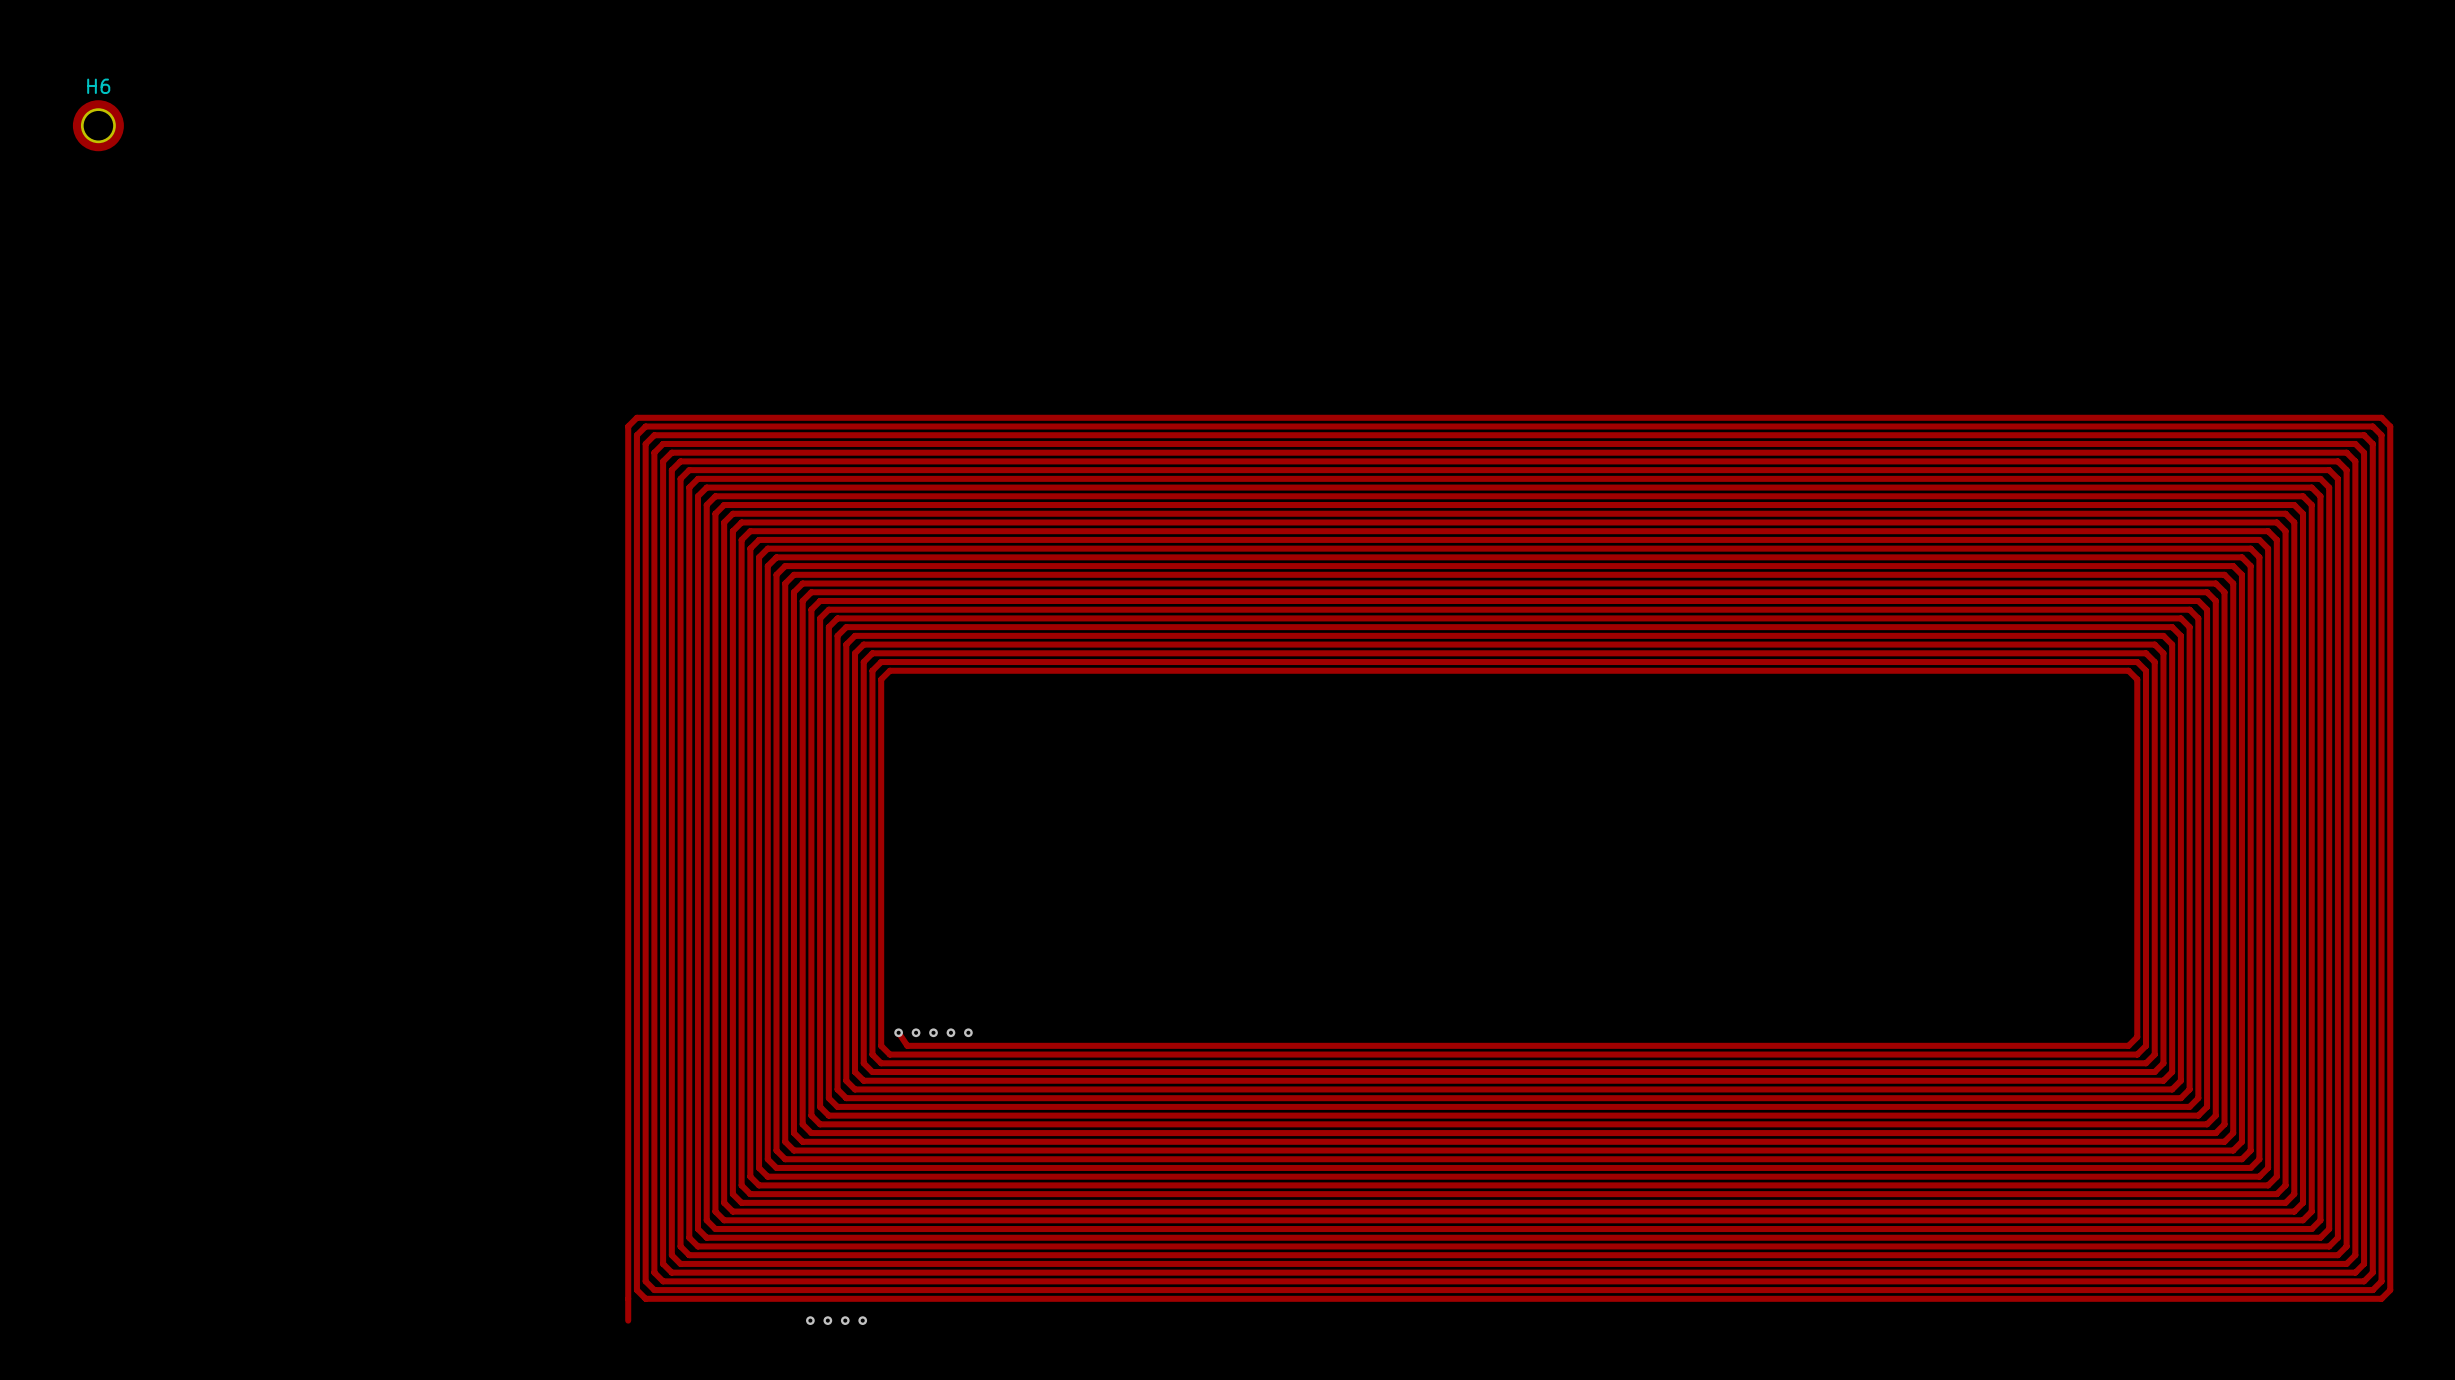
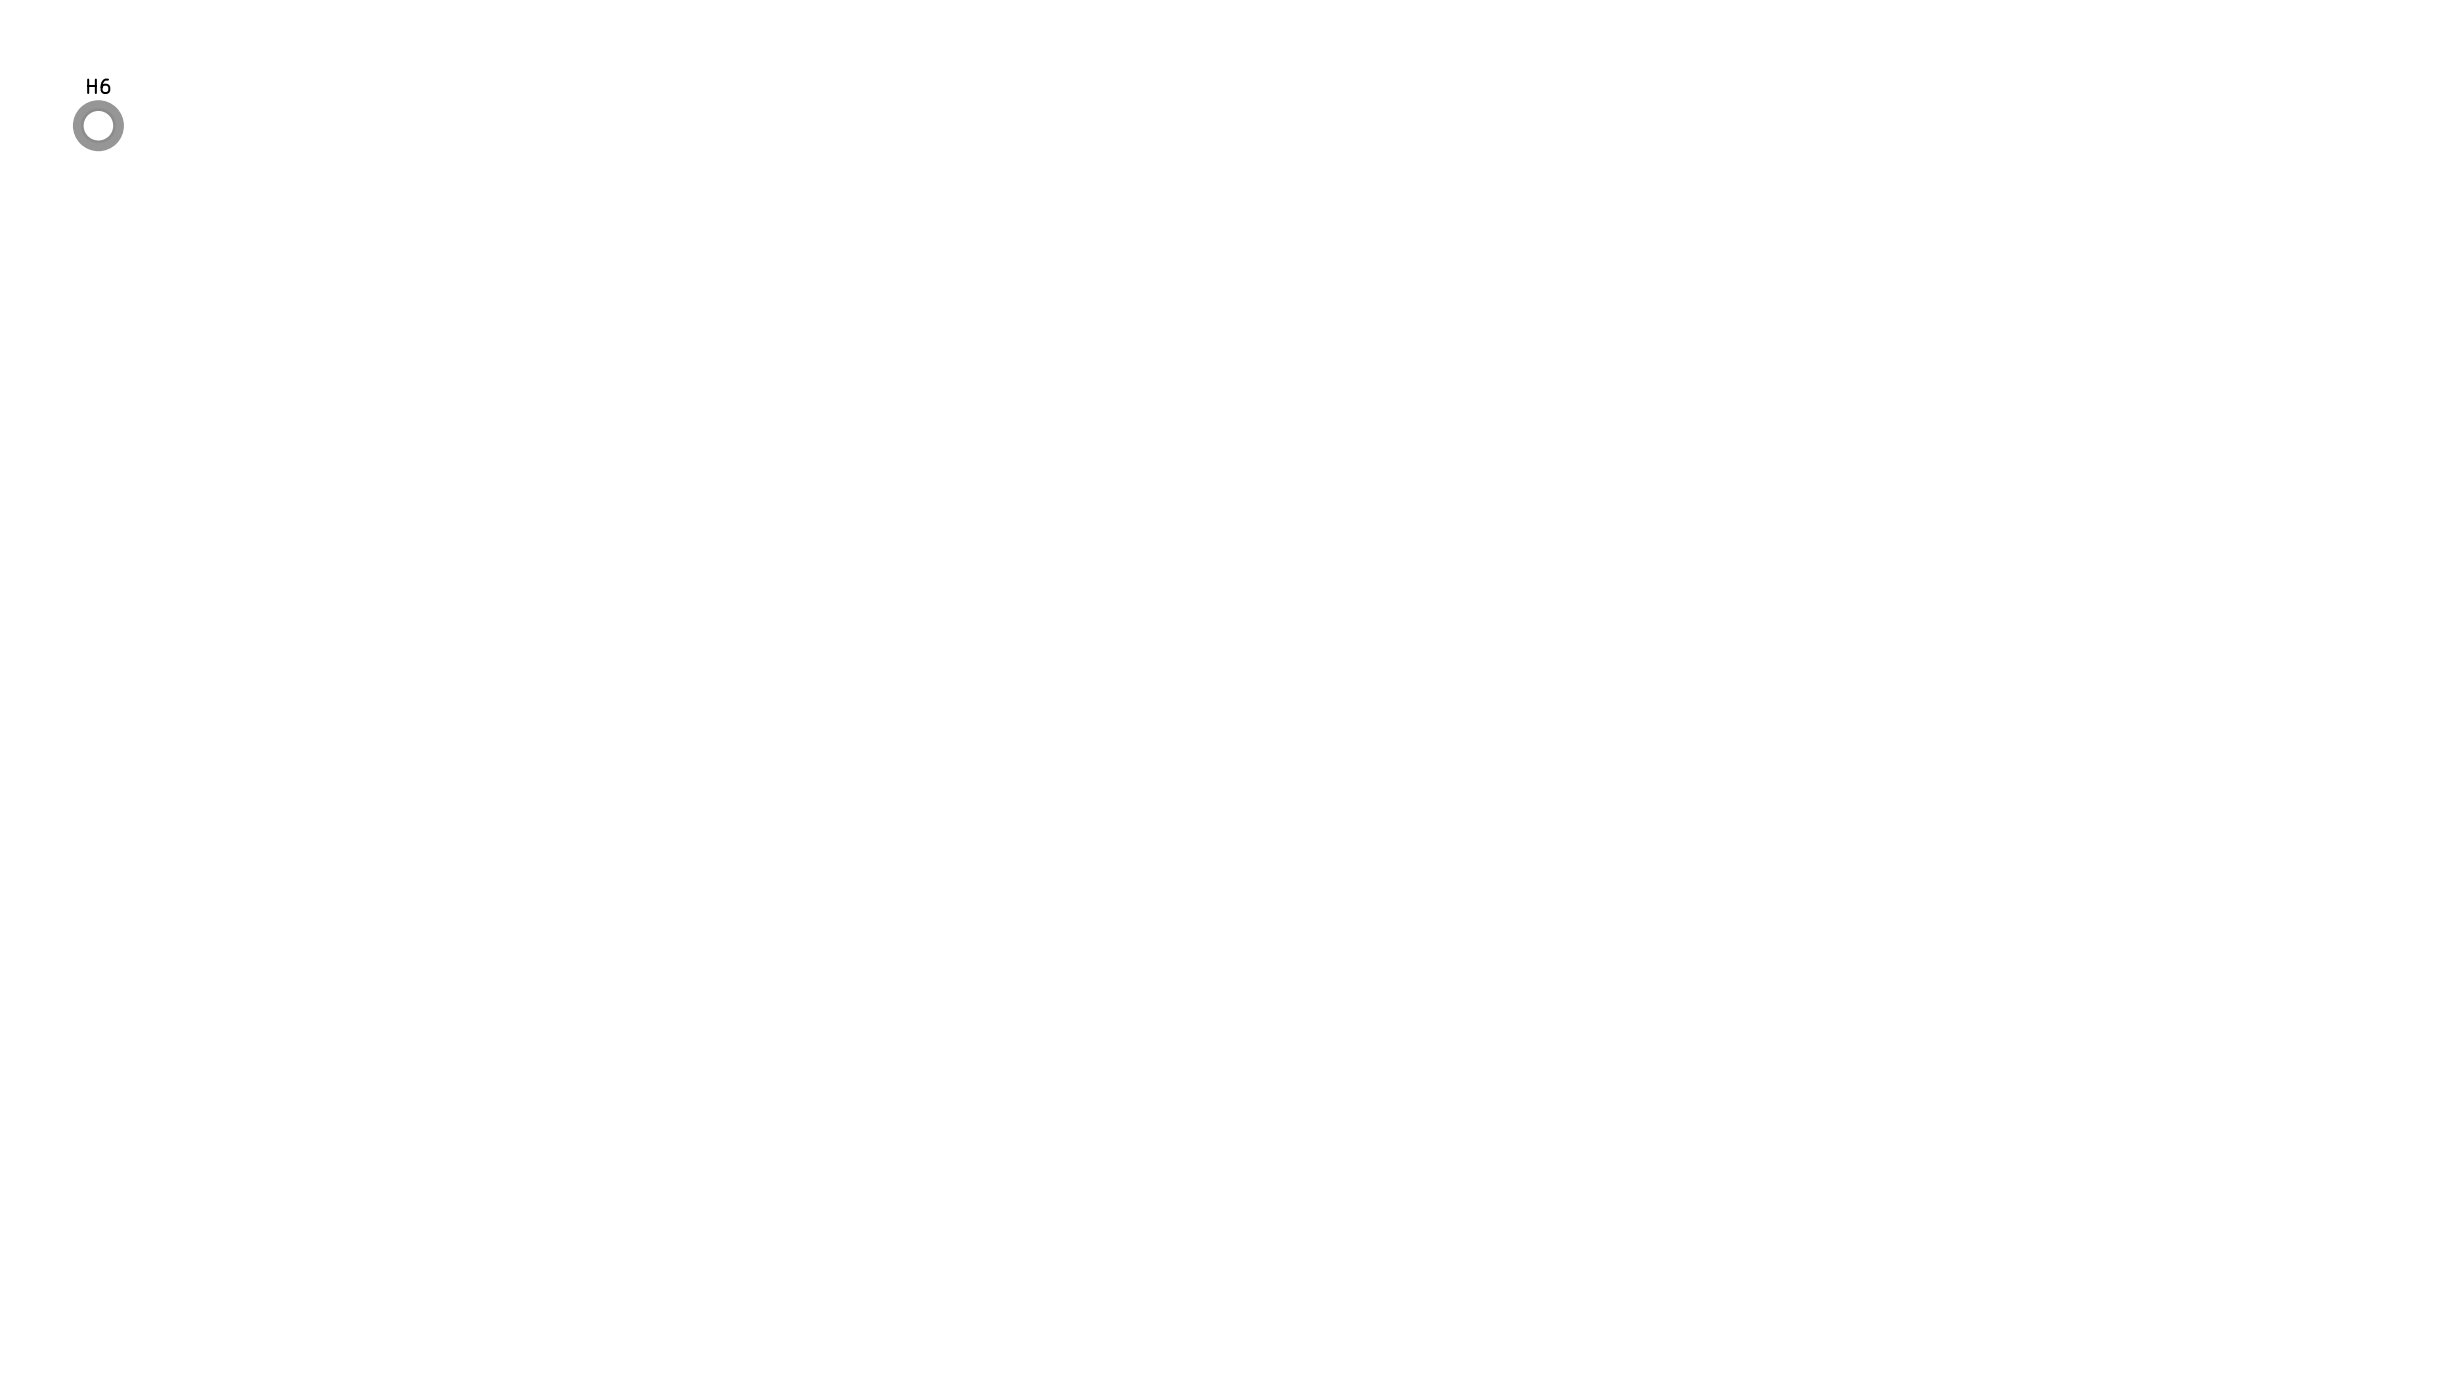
track: (898, 1032) (907, 1045) (2128, 1045) (2137, 1037) (2137, 679) (2128, 670) (889, 670) (881, 679) (881, 1045) (889, 1054) (2137, 1054) (2146, 1045) (2146, 670) (2137, 662) (881, 662) (872, 670) (872, 1054) (881, 1063) (2146, 1063) (2154, 1054) (2154, 662) (2146, 653) (872, 653) (863, 662) (863, 1063) (872, 1072) (2154, 1072) (2163, 1063) (2163, 653) (2154, 644) (863, 644) (855, 653) (855, 1072) (863, 1080) (2163, 1080) (2172, 1072) (2172, 644) (2163, 635) (855, 635) (846, 644) (846, 1080) (855, 1089) (2172, 1089) (2180, 1080) (2180, 635) (2172, 627) (846, 627) (837, 635) (837, 1089) (846, 1098) (2180, 1098) (2189, 1089) (2189, 627) (2180, 618) (837, 618) (828, 627) (828, 1098) (837, 1106) (2189, 1106) (2198, 1098) (2198, 618) (2189, 609) (828, 609) (820, 618) (820, 1106) (828, 1115) (2198, 1115) (2207, 1106) (2207, 609) (2198, 600) (820, 600) (811, 609) (811, 1115) (820, 1124) (2207, 1124) (2215, 1115) (2215, 600) (2207, 592) (811, 592) (802, 600) (802, 1124) (811, 1133) (2215, 1133) (2224, 1124) (2224, 592) (2215, 583) (802, 583) (793, 592) (793, 1133) (802, 1141) (2224, 1141) (2233, 1133) (2233, 583) (2224, 574) (793, 574) (785, 583) (785, 1141) (793, 1150) (2233, 1150) (2241, 1141) (2241, 574) (2233, 566) (785, 566) (776, 574) (776, 1150) (785, 1159) (2241, 1159) (2250, 1150) (2250, 566) (2241, 557) (776, 557) (767, 566) (767, 1159) (776, 1167) (2250, 1167) (2259, 1159) (2259, 557) (2250, 548) (767, 548) (759, 557) (759, 1167) (767, 1176) (2259, 1176) (2268, 1167) (2268, 548) (2259, 539) (759, 539) (750, 548) (750, 1176) (759, 1185) (2268, 1185) (2276, 1176) (2276, 539) (2268, 531) (750, 531) (741, 539) (741, 1185) (750, 1194) (2276, 1194) (2285, 1185) (2285, 531) (2276, 522) (741, 522) (732, 531) (732, 1194) (741, 1202) (2285, 1202) (2294, 1194) (2294, 522) (2285, 513) (732, 513) (724, 522) (724, 1202) (732, 1211) (2294, 1211) (2303, 1202) (2303, 513) (2294, 505) (724, 505) (715, 513) (715, 1211) (724, 1220) (2303, 1220) (2311, 1211) (2311, 505) (2303, 496) (715, 496) (706, 505) (706, 1220) (715, 1229) (2311, 1229) (2320, 1220) (2320, 496) (2311, 487) (706, 487) (697, 496) (697, 1229) (706, 1237) (2320, 1237) (2329, 1229) (2329, 487) (2320, 478) (697, 478) (689, 487) (689, 1237) (697, 1246) (2329, 1246) (2337, 1237) (2337, 478) (2329, 470) (689, 470) (680, 478) (680, 1246) (689, 1255) (2337, 1255) (2346, 1246) (2346, 470) (2337, 461) (680, 461) (671, 470) (671, 1255) (680, 1263) (2346, 1263) (2355, 1255) (2355, 461) (2346, 452) (671, 452) (663, 461) (663, 1263) (671, 1272) (2355, 1272) (2364, 1263) (2364, 452) (2355, 443) (663, 443) (654, 452) (654, 1272) (663, 1281) (2364, 1281) (2372, 1272) (2372, 443) (2364, 435) (654, 435) (645, 443) (645, 1281) (654, 1290) (2372, 1290) (2381, 1281) (2381, 435) (2372, 426) (645, 426) (636, 435) (636, 1290) (645, 1298) (2381, 1298) (2390, 1290) (2390, 426) (2381, 417) (636, 417) (628, 426) (628, 1320) -> none
via: (898, 1032) -> none
via: (916, 1032) -> none
via: (933, 1032) -> none
via: (950, 1032) -> none
via: (968, 1032) -> none
via: (810, 1320) -> none
via: (827, 1320) -> none
via: (845, 1320) -> none
via: (862, 1320) -> none

